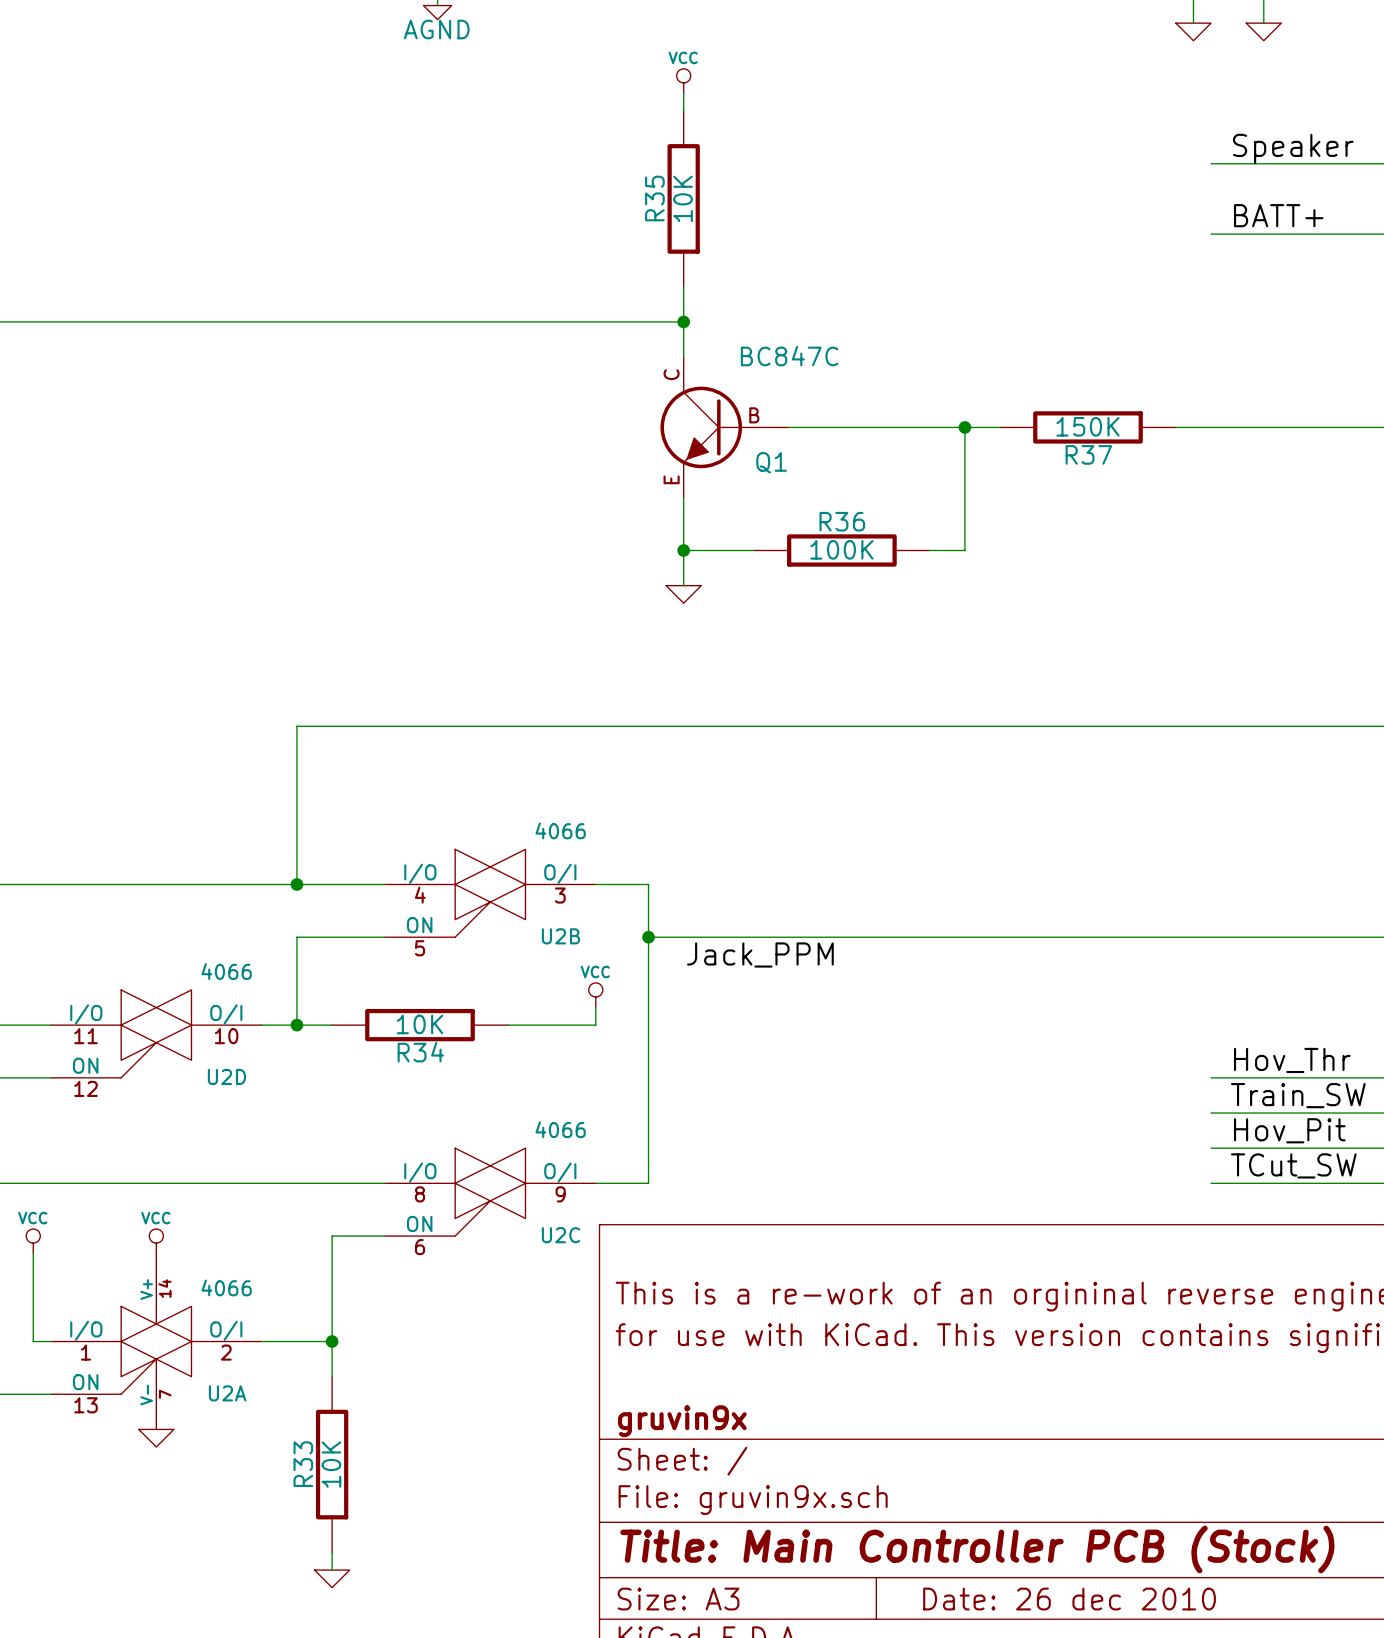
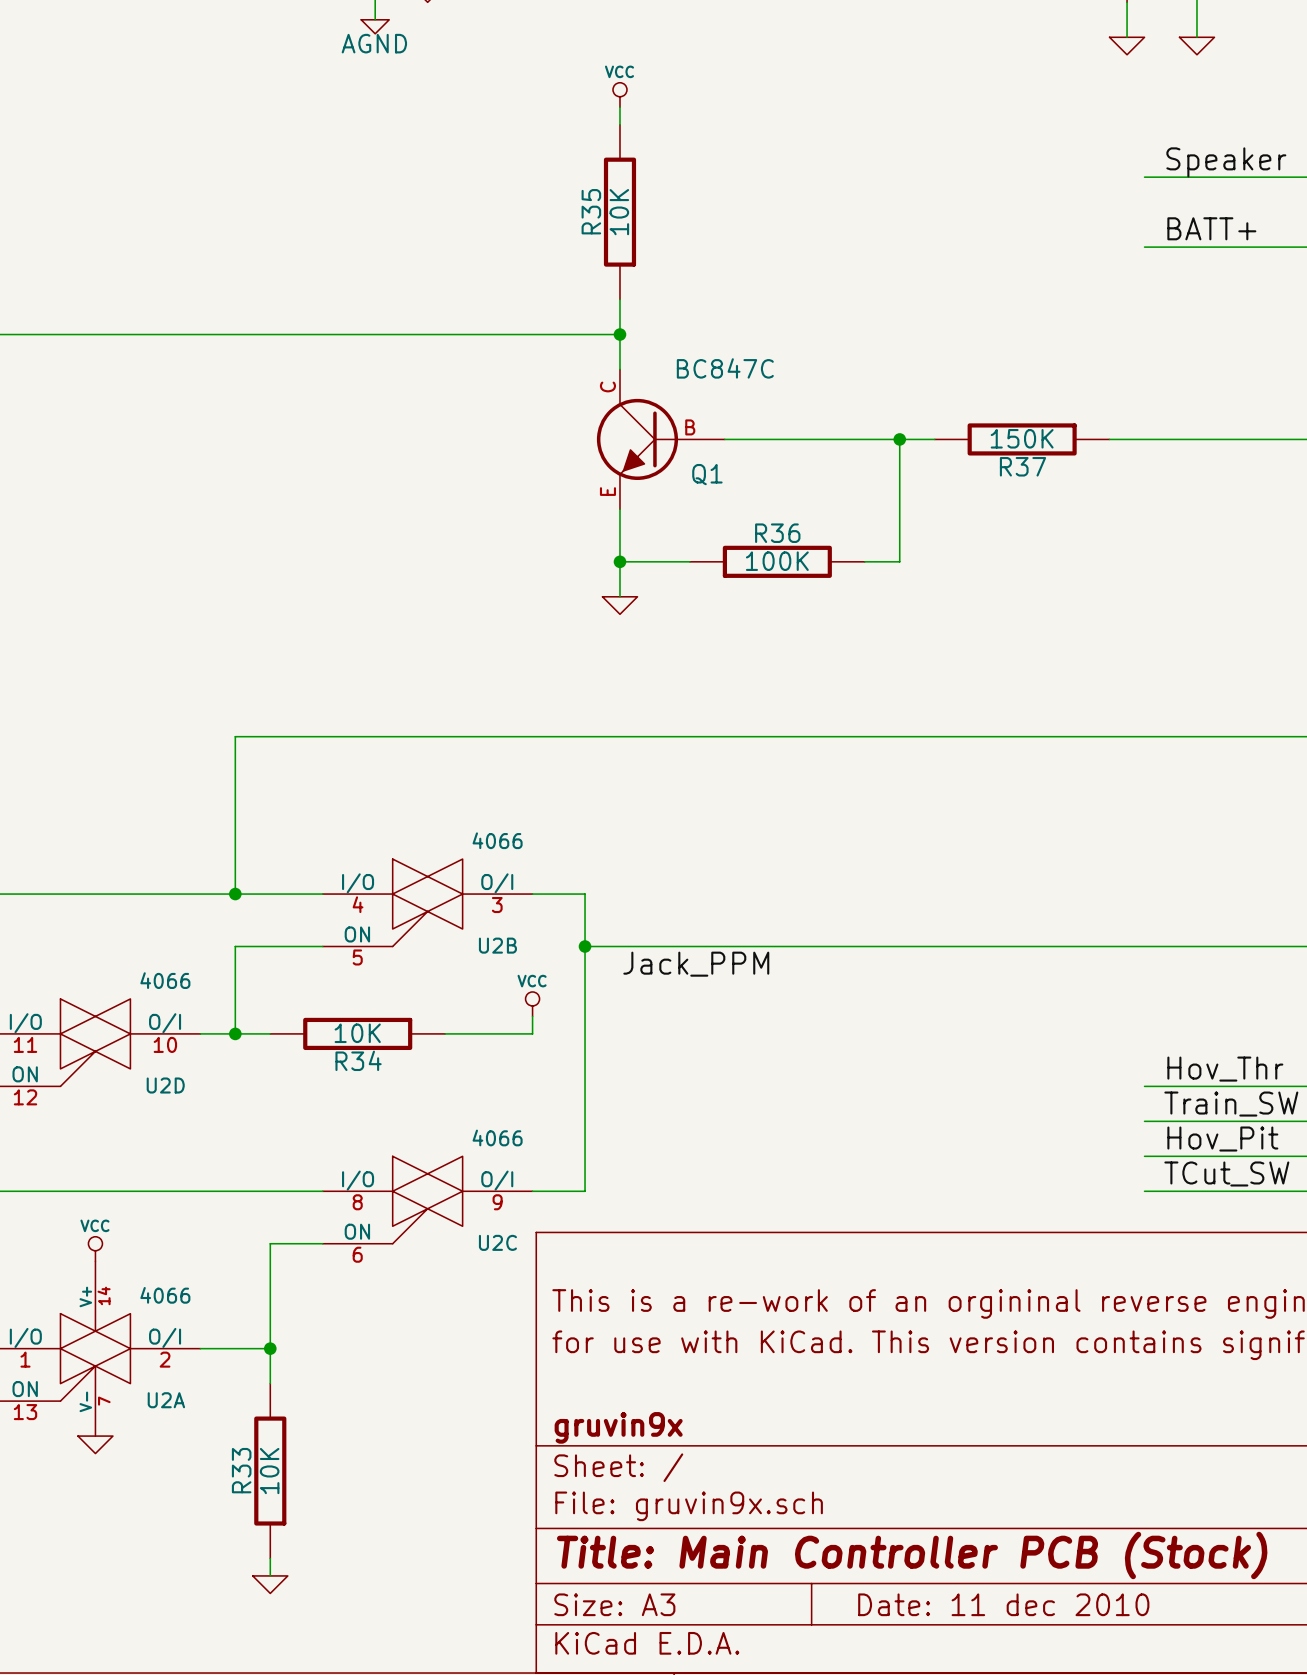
title block: Date: 26 dec 2010 (1069, 1599) -> Date: 11 dec 2010 (1003, 1604)

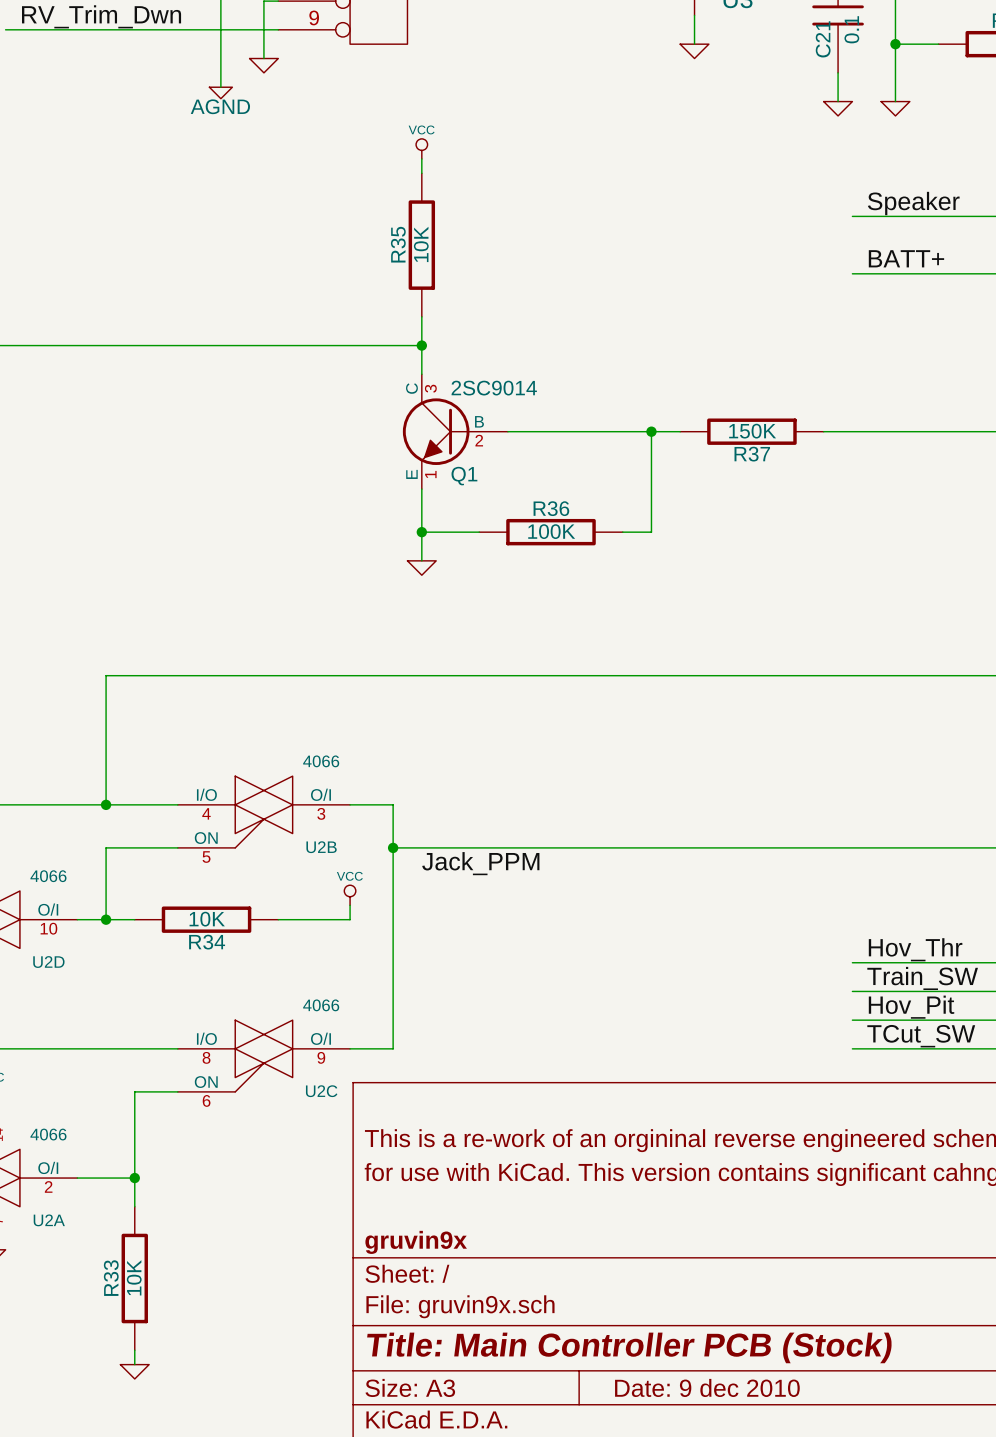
Q1 value: BC847C (725, 368) -> 2SC9014 (494, 388)
Q1 pin name: none -> C (411, 388)
Q1 pin number: C (607, 386) -> 3 (430, 388)
Q1 pin name: none -> B (479, 421)
Q1 pin number: B (690, 427) -> 2 (479, 440)
Q1 name position: Q1 (707, 474) -> Q1 (464, 476)
Q1 pin name: none -> E (411, 474)
Q1 pin number: E (607, 491) -> 1 (430, 474)
title block: Date: 11 dec 2010 (1003, 1604) -> Date: 9 dec 2010 (707, 1387)

